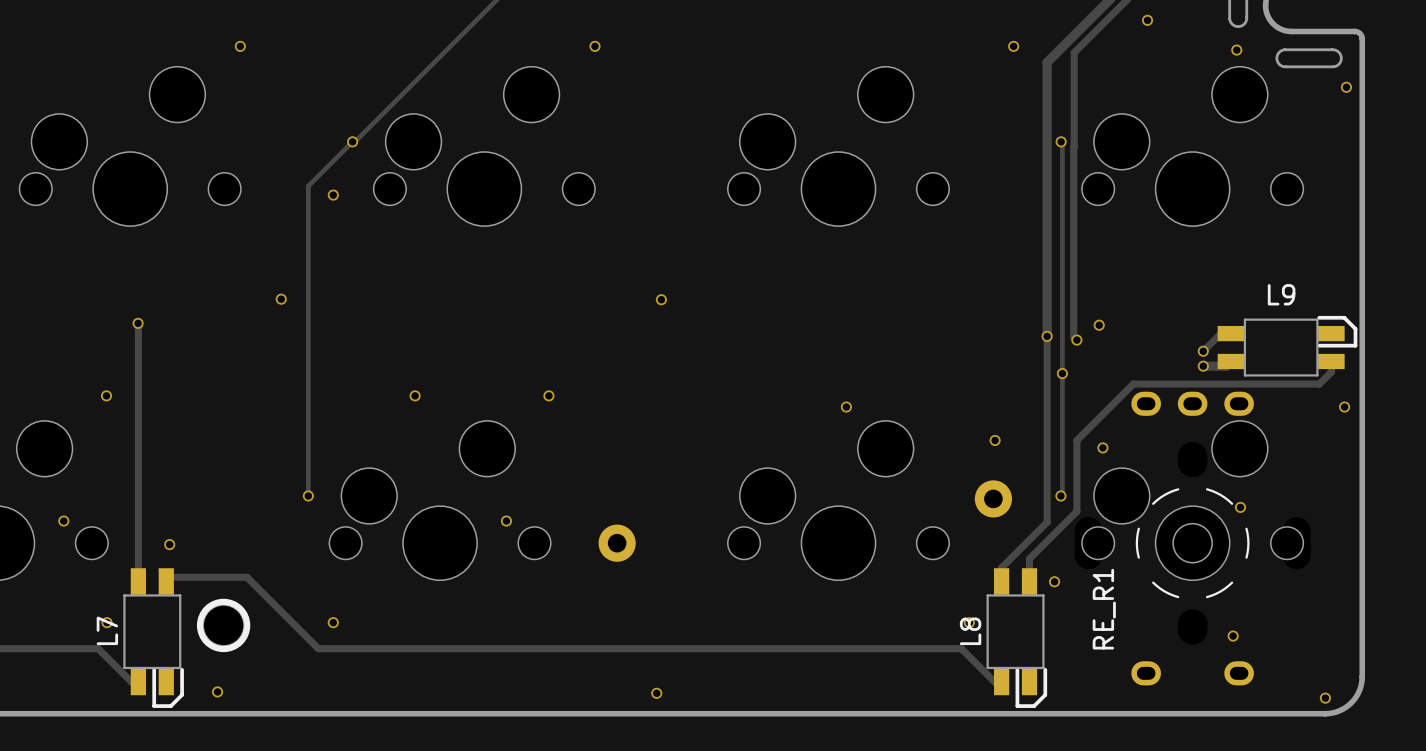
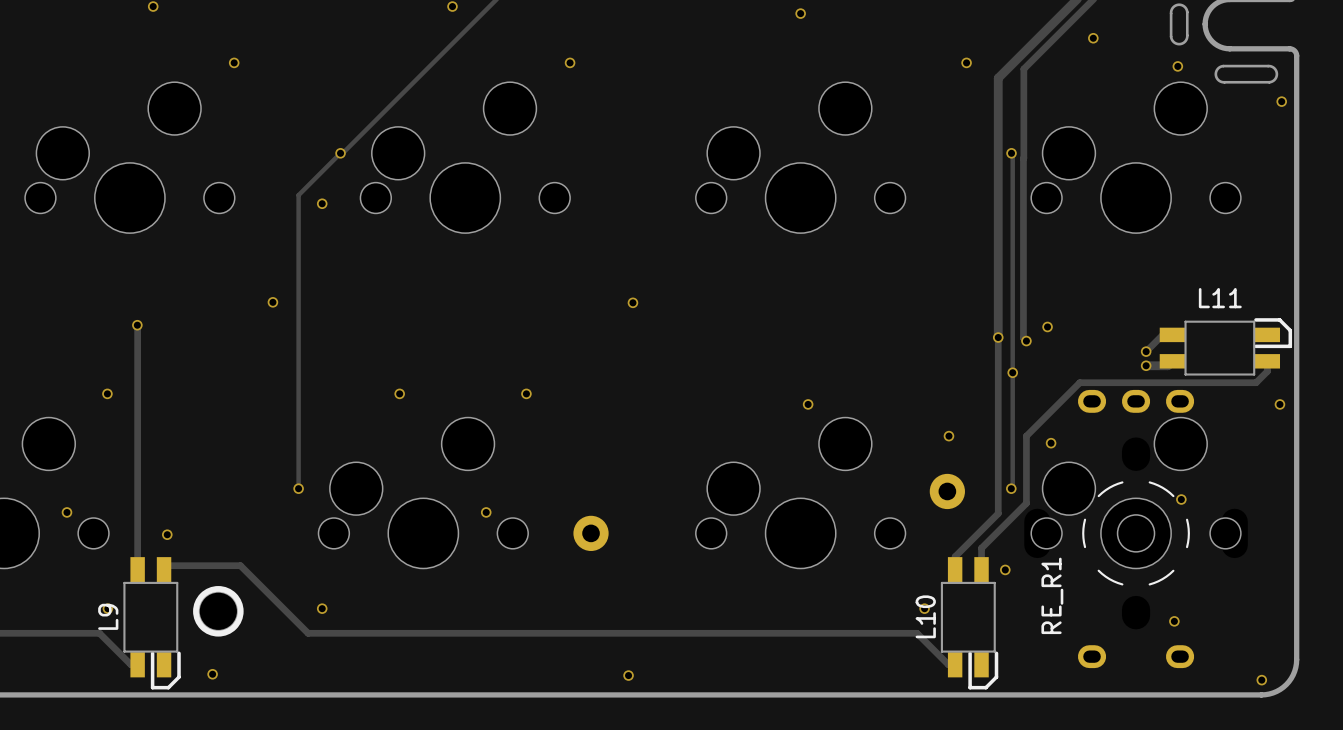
L9 name: L9 (1281, 294) -> L11 (1220, 298)
L7 name: L7 (107, 630) -> L9 (108, 616)
L8 name: L8 (970, 631) -> L10 (925, 616)

